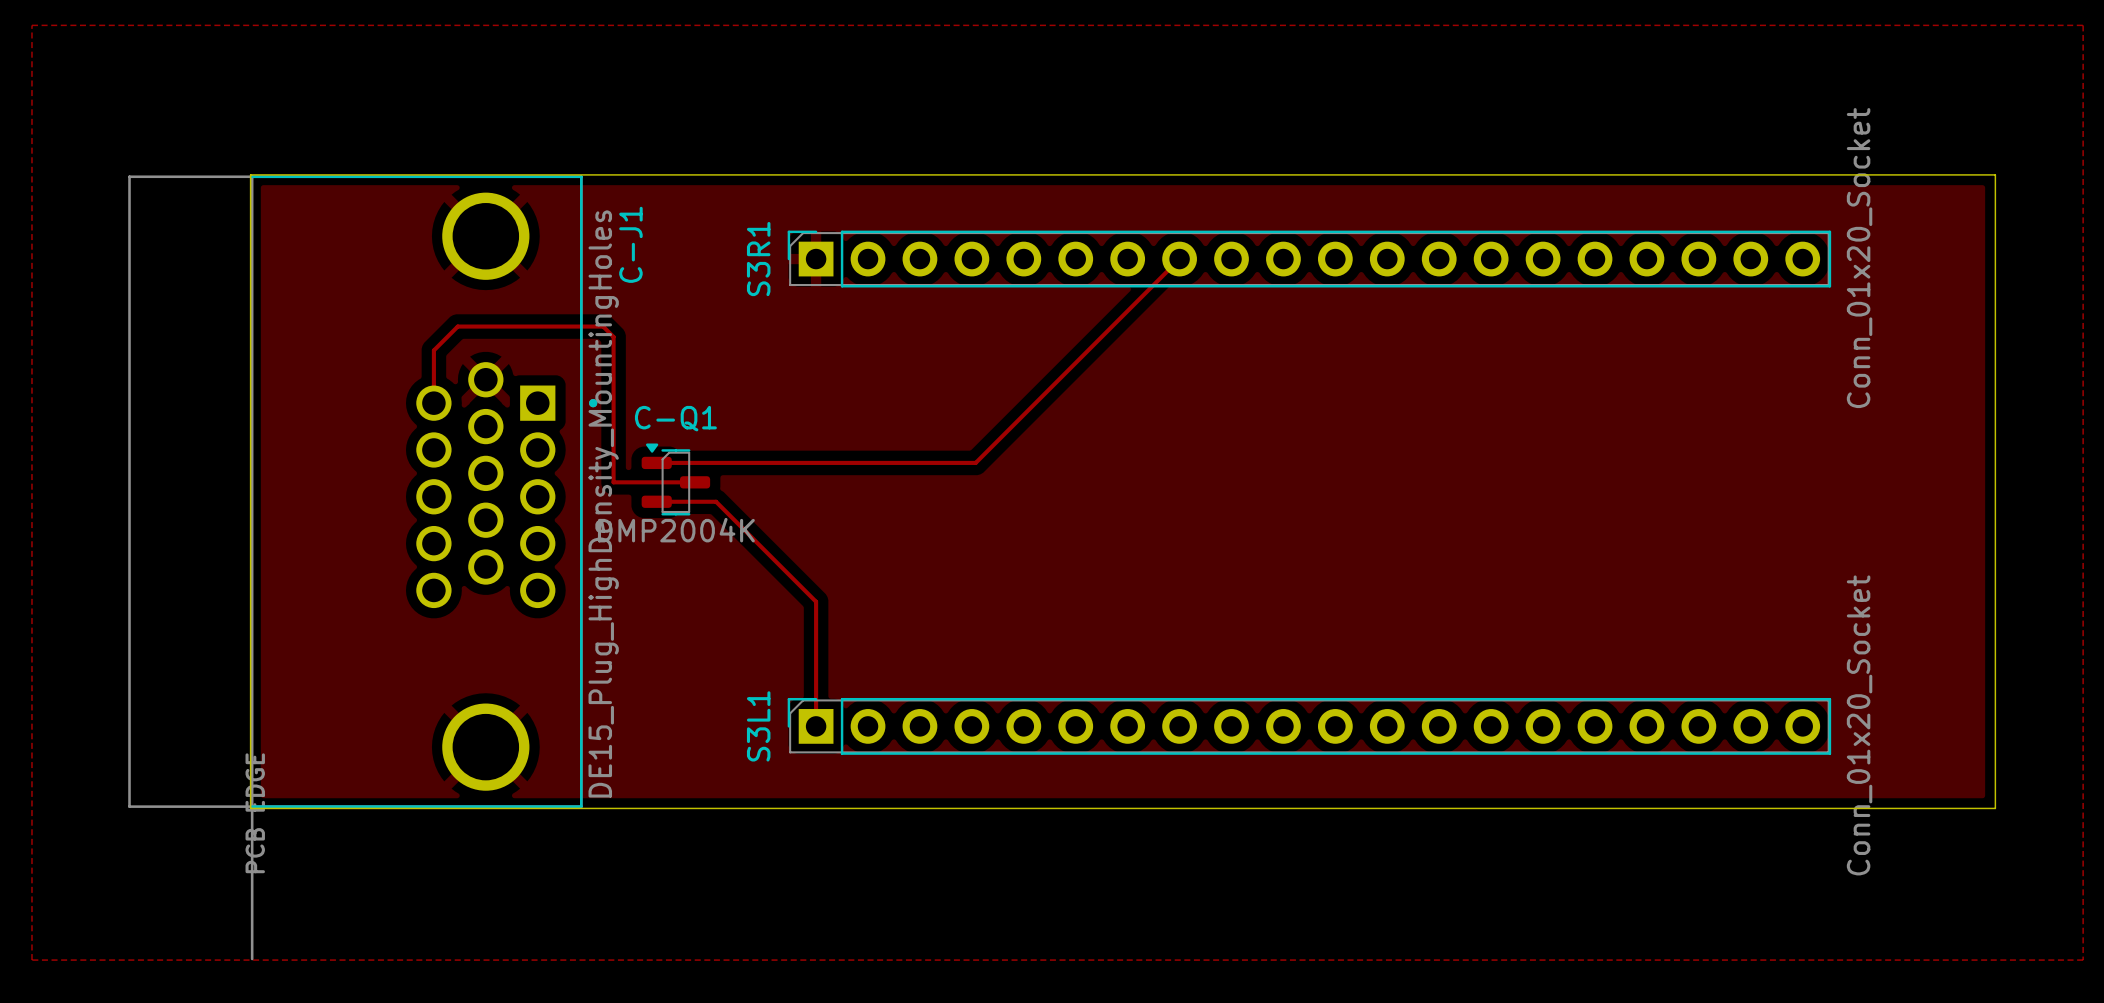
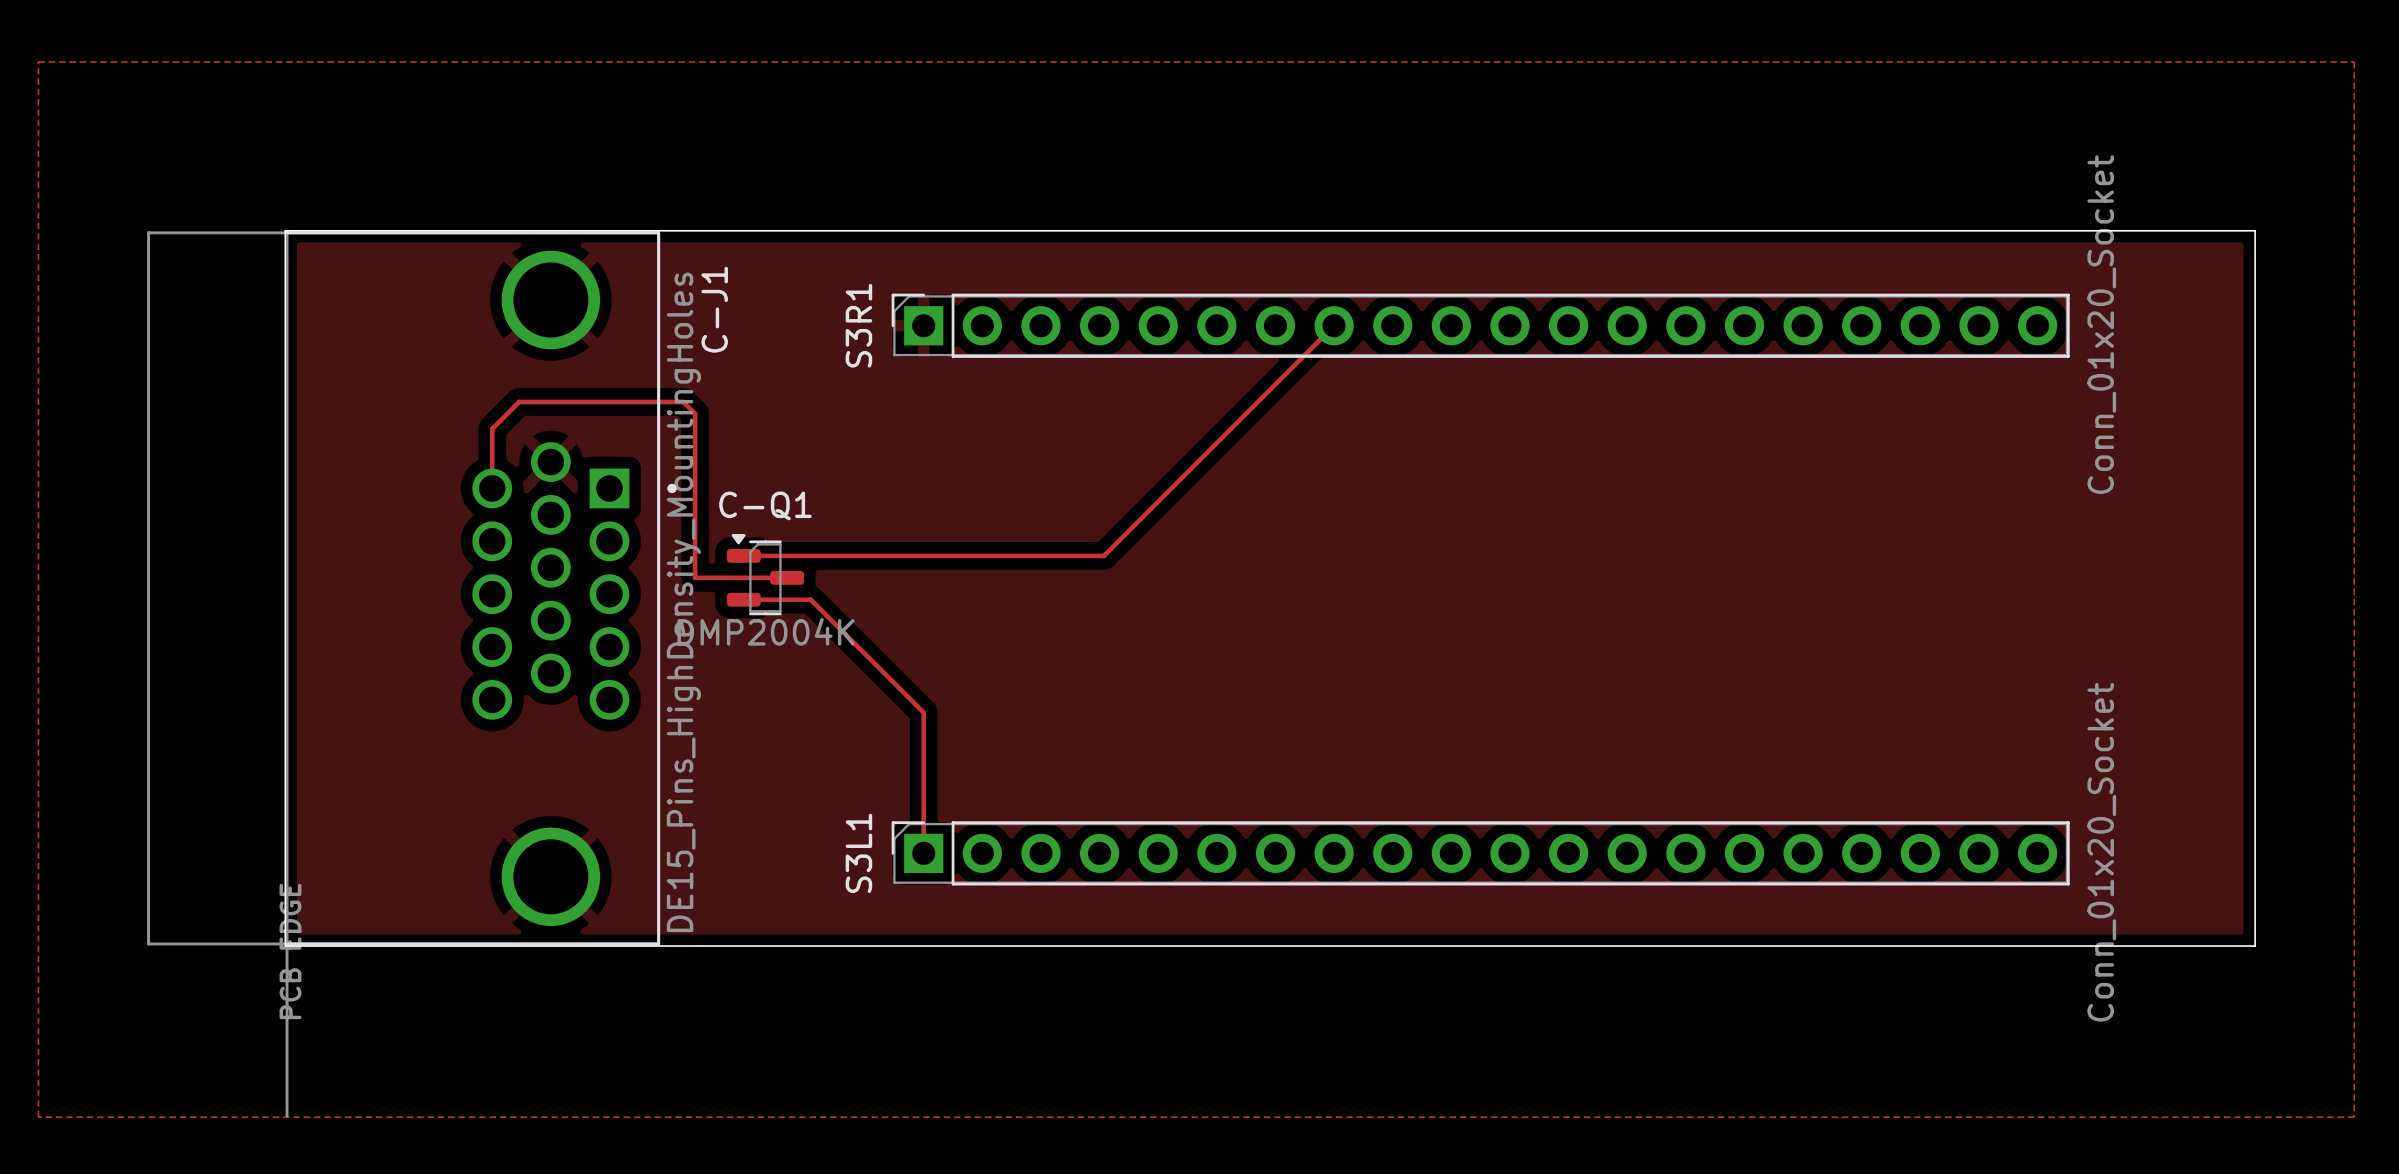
C-J1 value: DE15_Plug_HighDensity_MountingHoles (603, 503) -> DE15_Pins_HighDensity_MountingHoles (683, 602)

